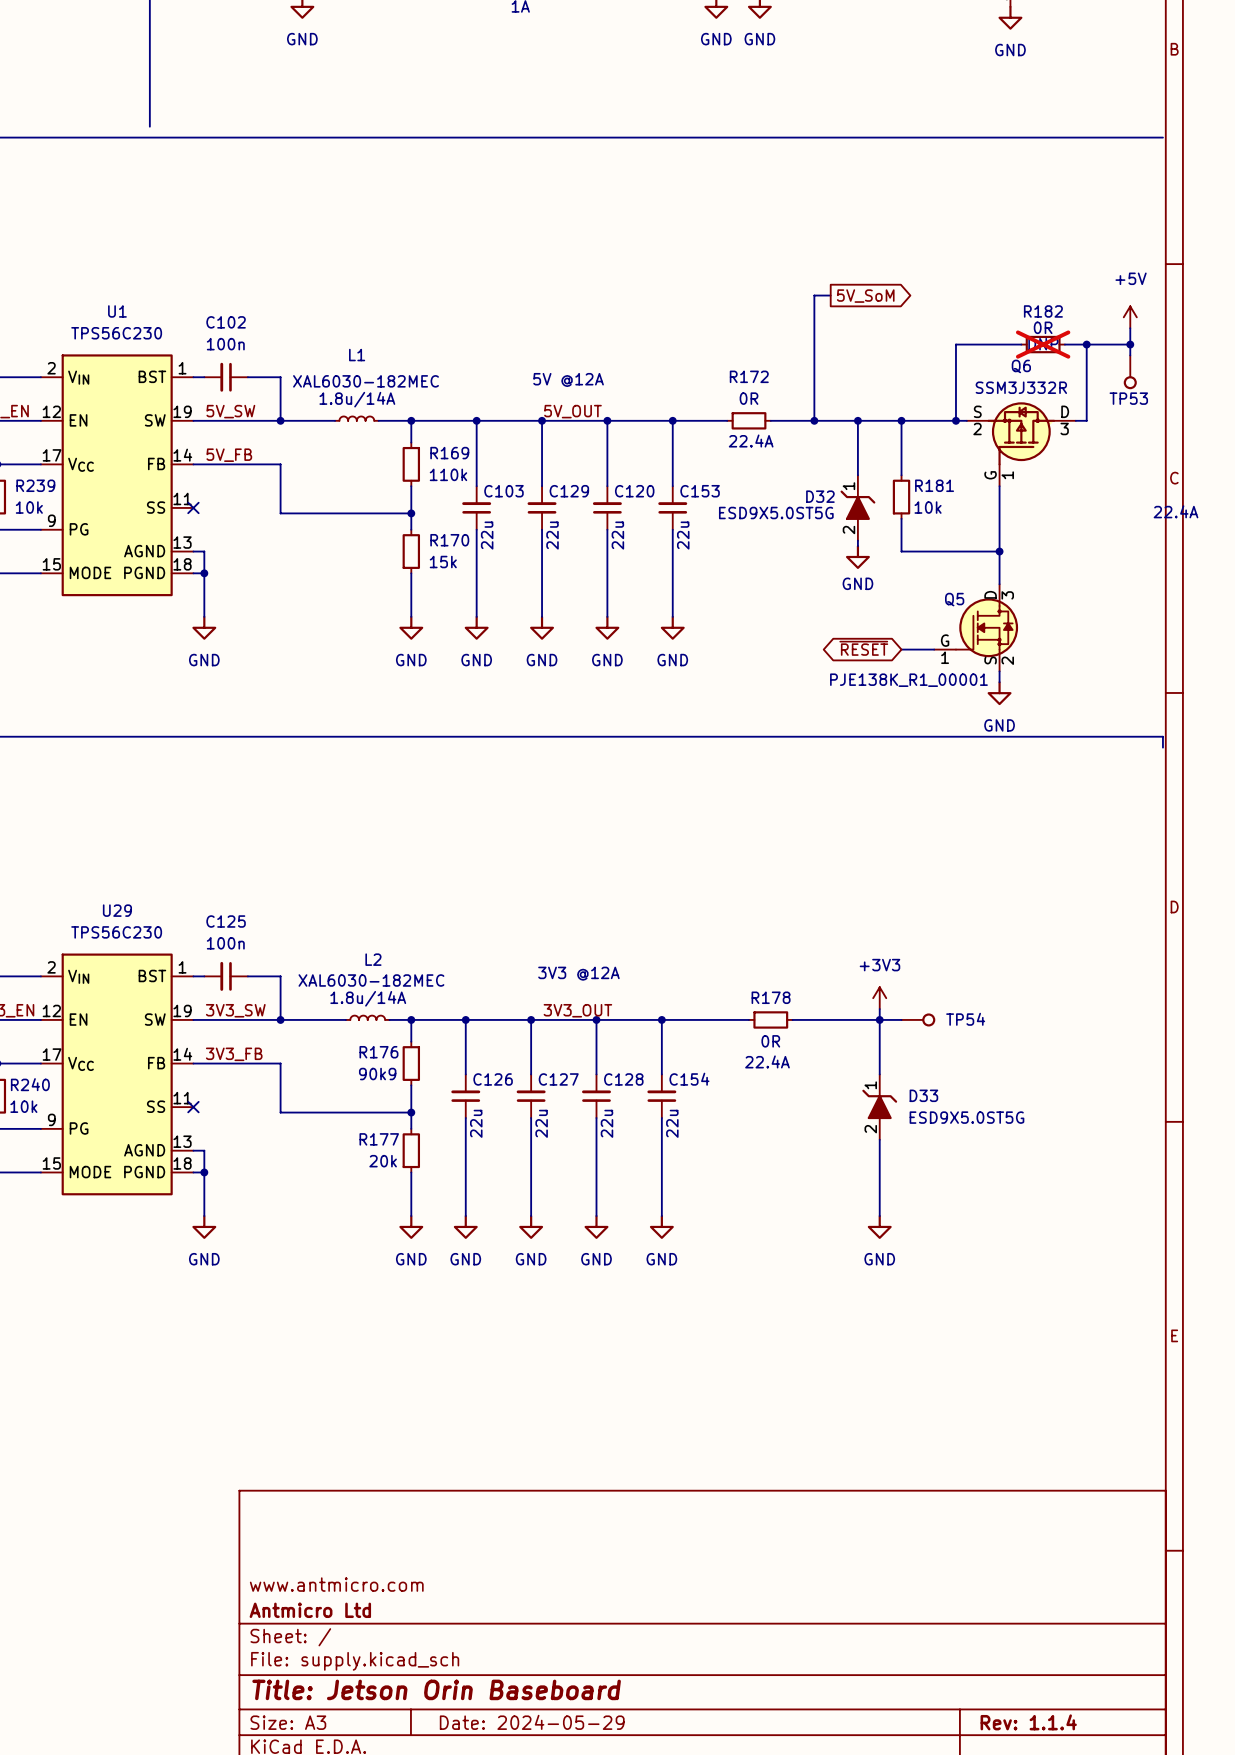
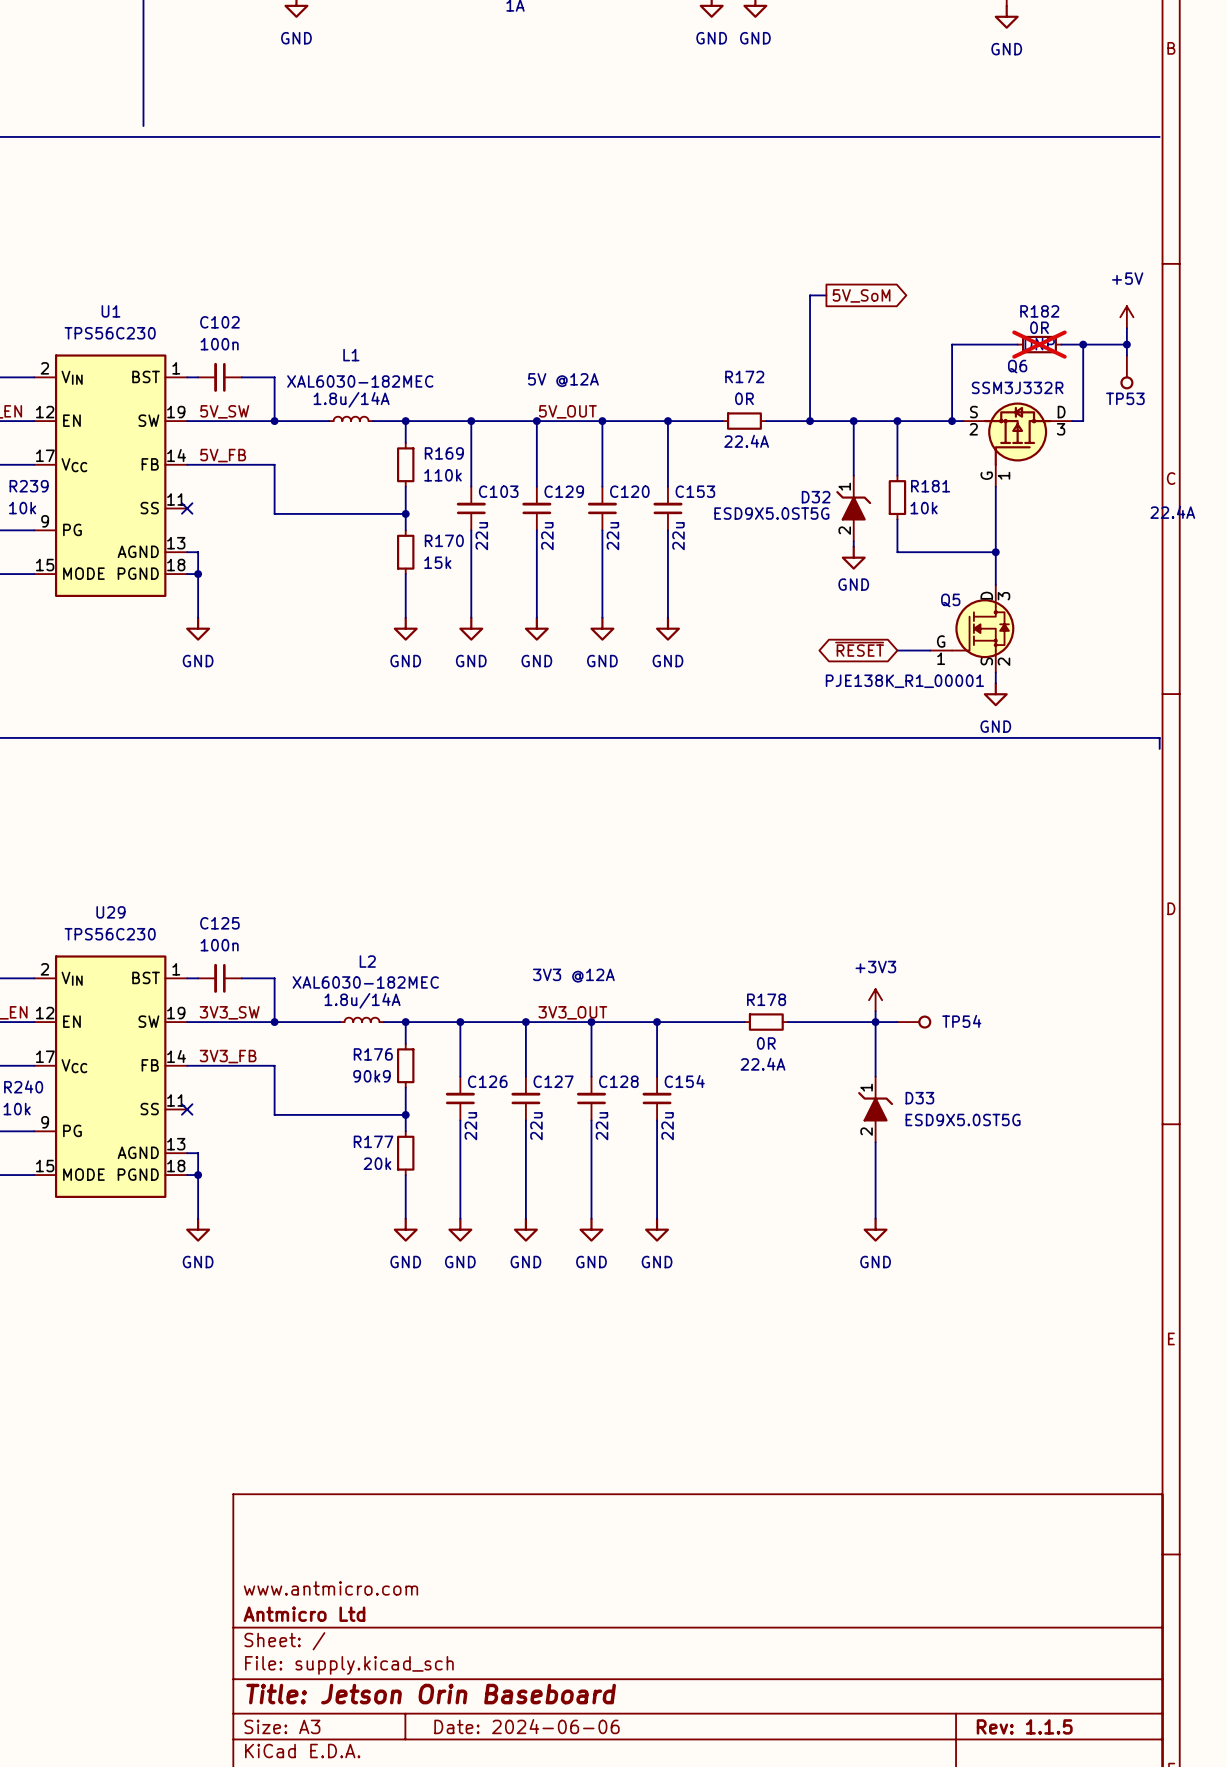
title block: Date: 2024-05-29 (532, 1722) -> Date: 2024-06-06 (527, 1726)
title block: Rev: 1.1.4 (1028, 1722) -> Rev: 1.1.5 (1024, 1726)

